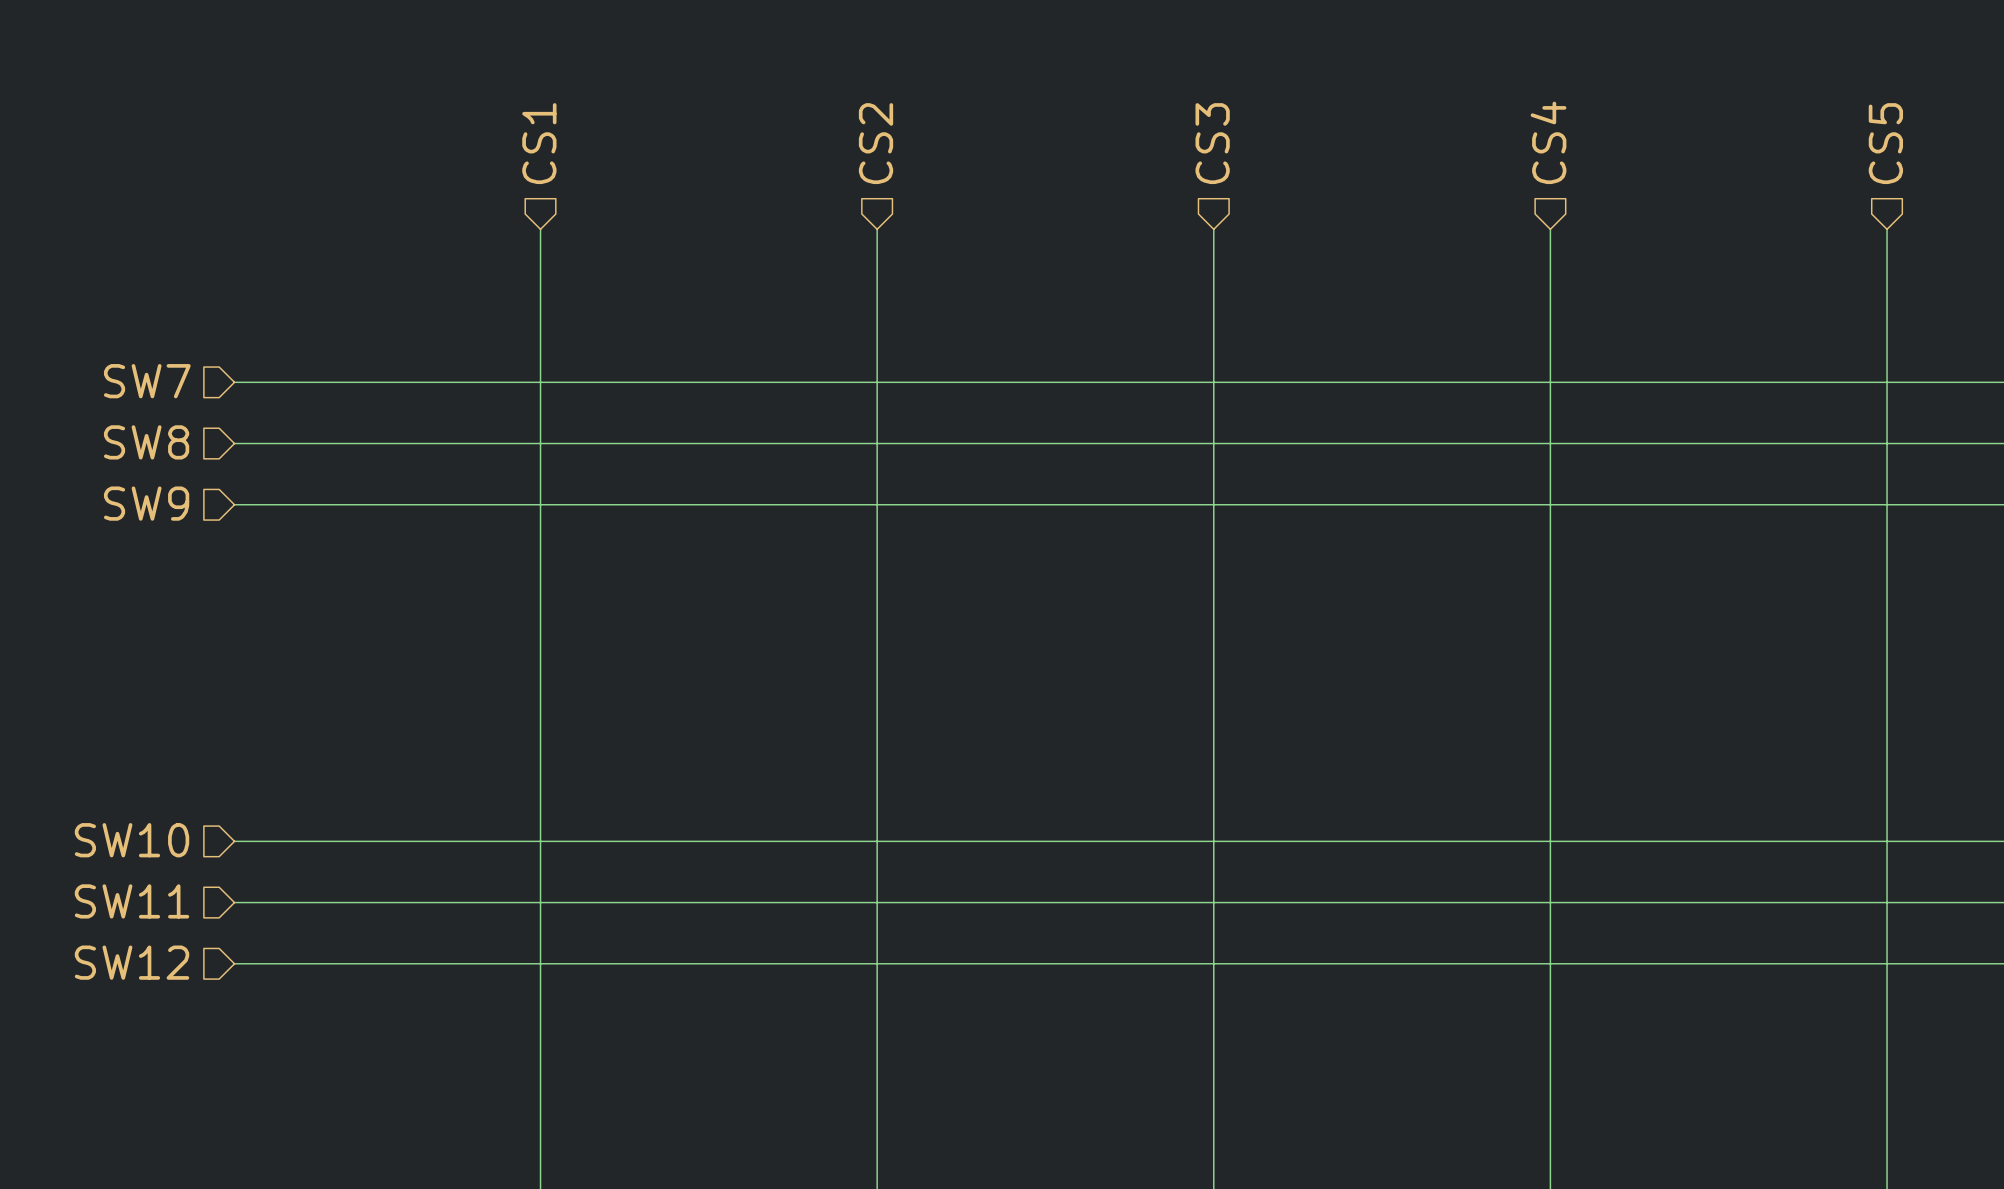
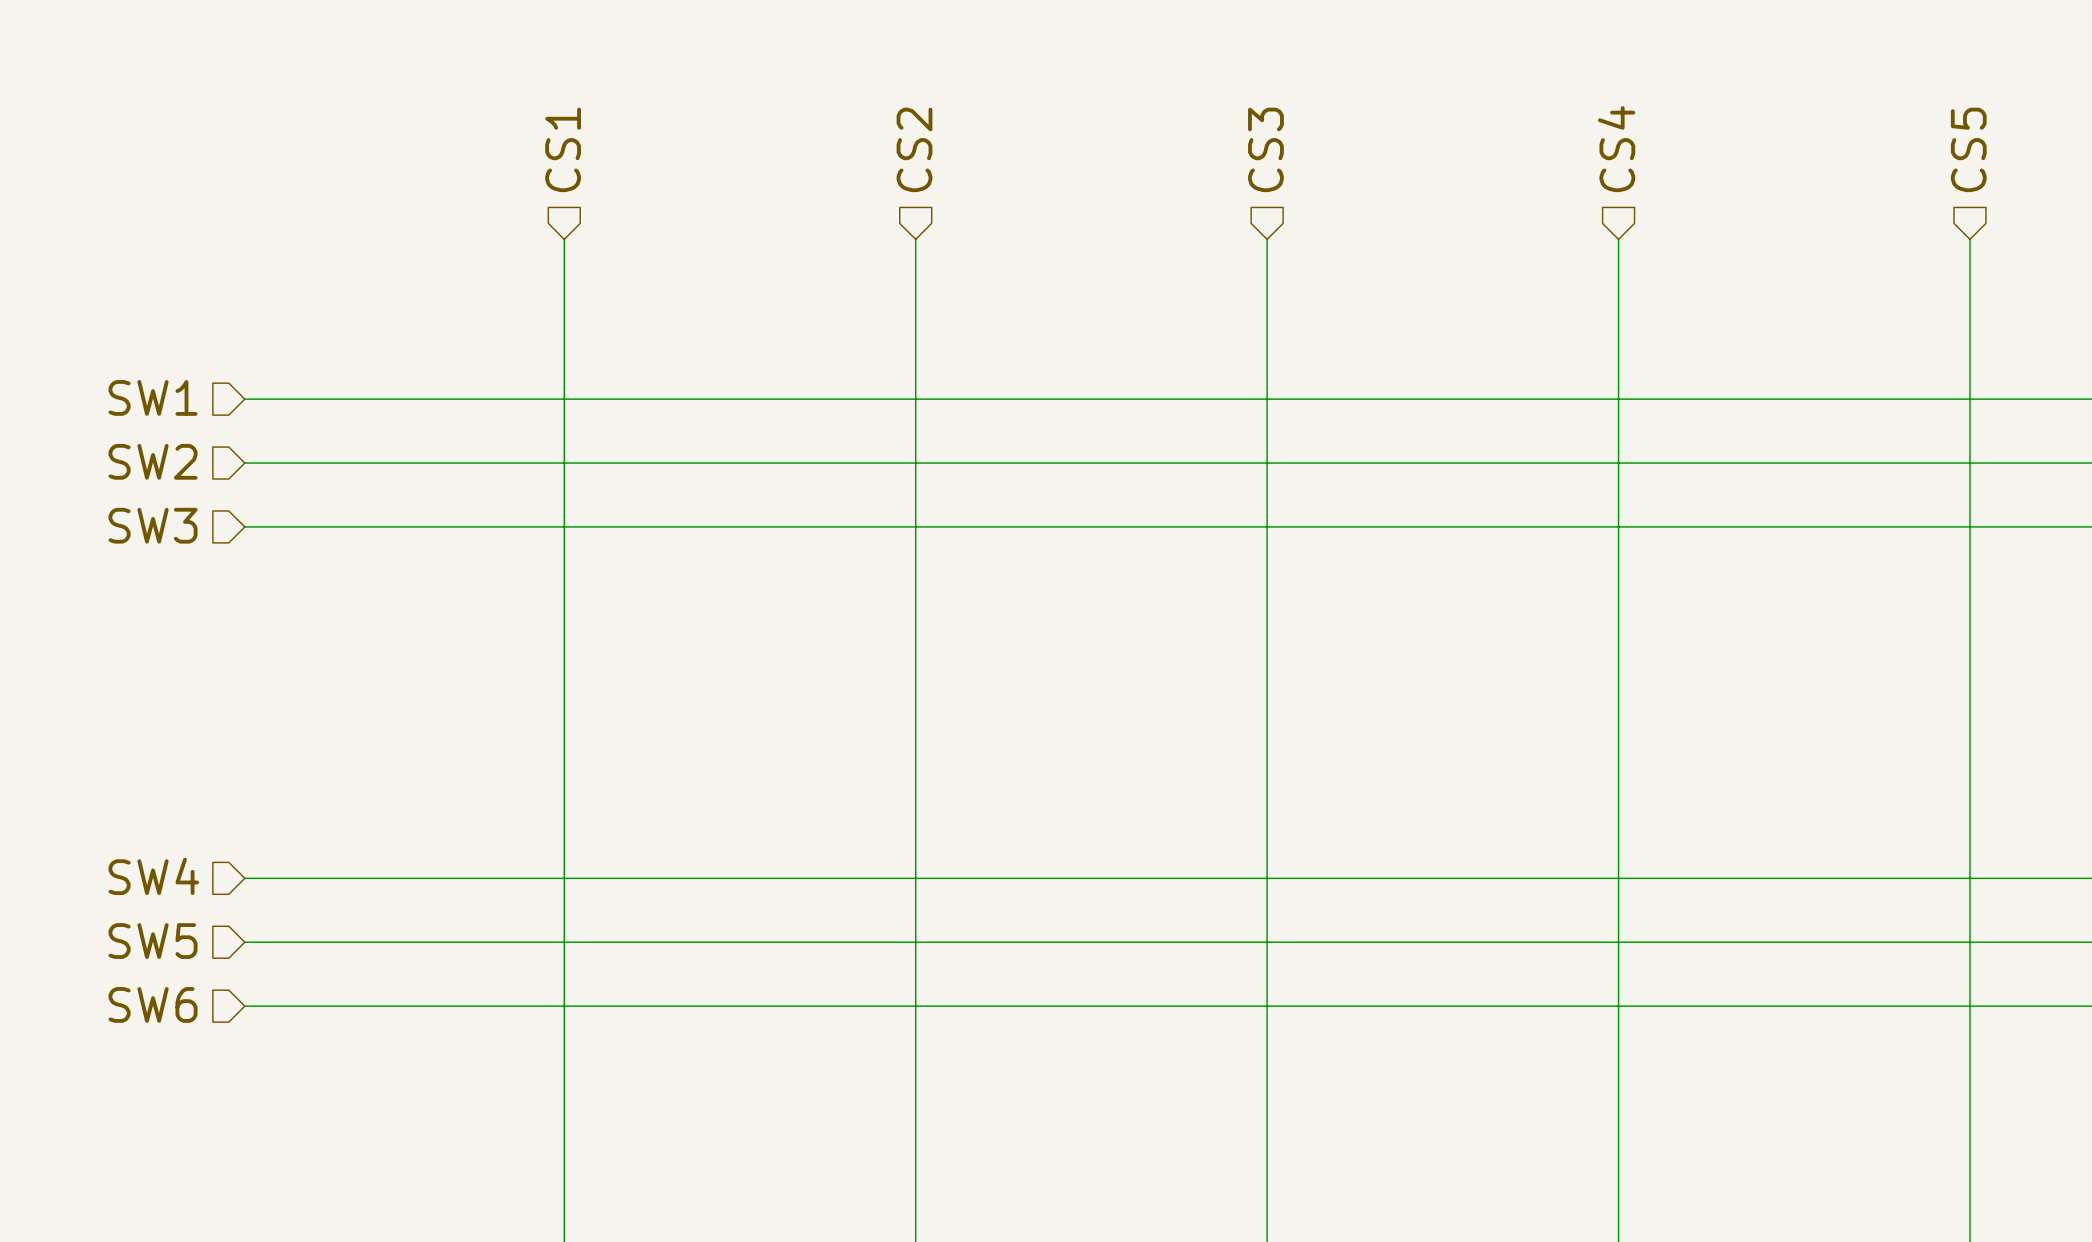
hierarchical label: SW7 (147, 381) -> SW1 (153, 397)
hierarchical label: SW8 (146, 442) -> SW2 (153, 461)
hierarchical label: SW9 (146, 503) -> SW3 (153, 525)
hierarchical label: SW10 (132, 840) -> SW4 (153, 876)
hierarchical label: SW11 (132, 901) -> SW5 (153, 941)
hierarchical label: SW12 (132, 962) -> SW6 (153, 1004)

